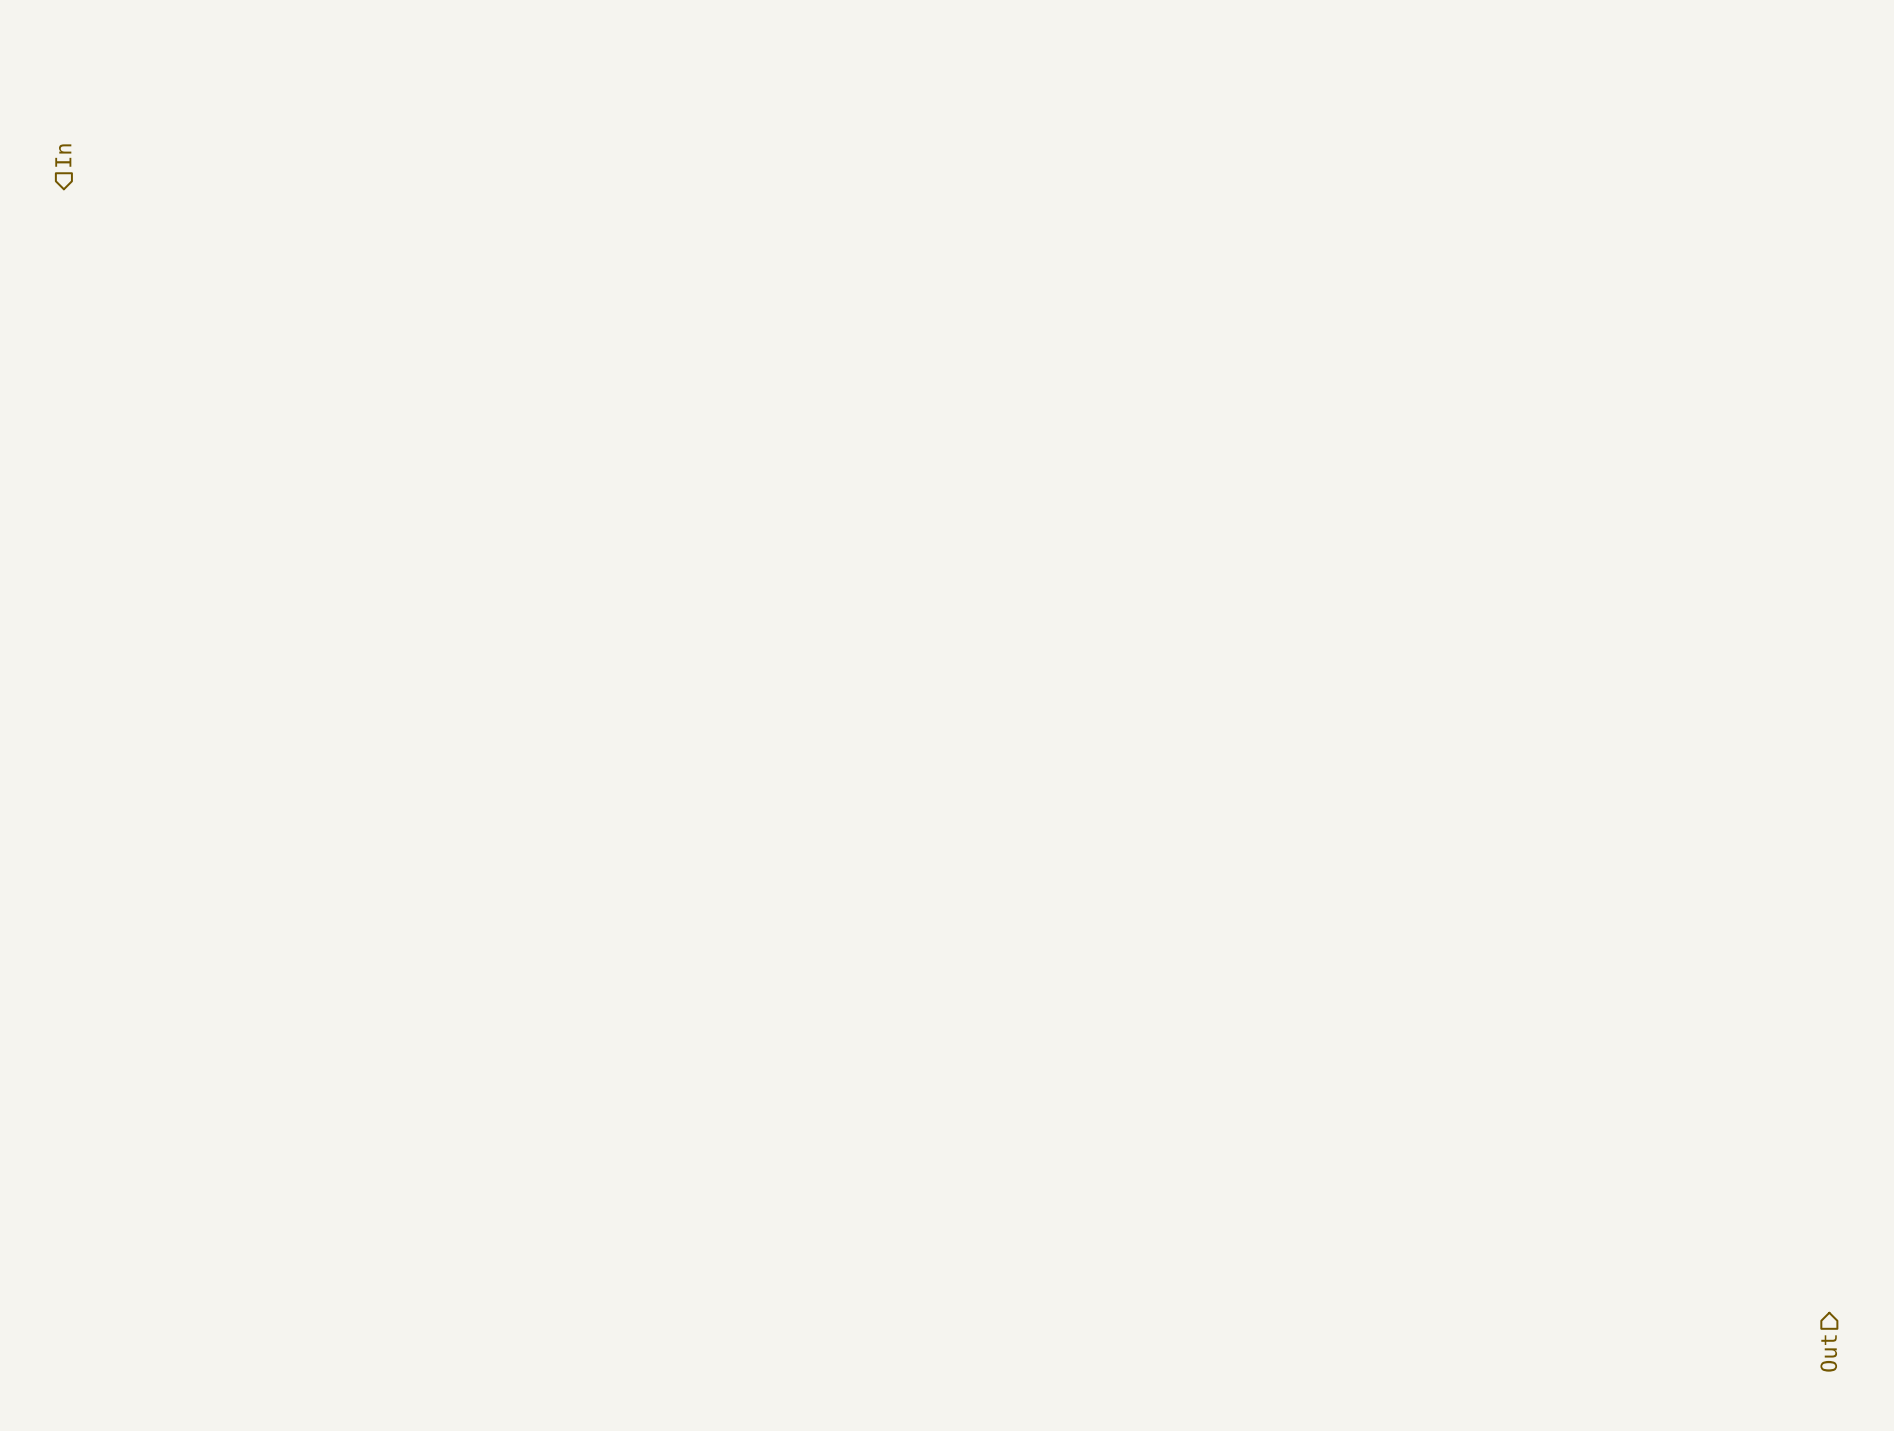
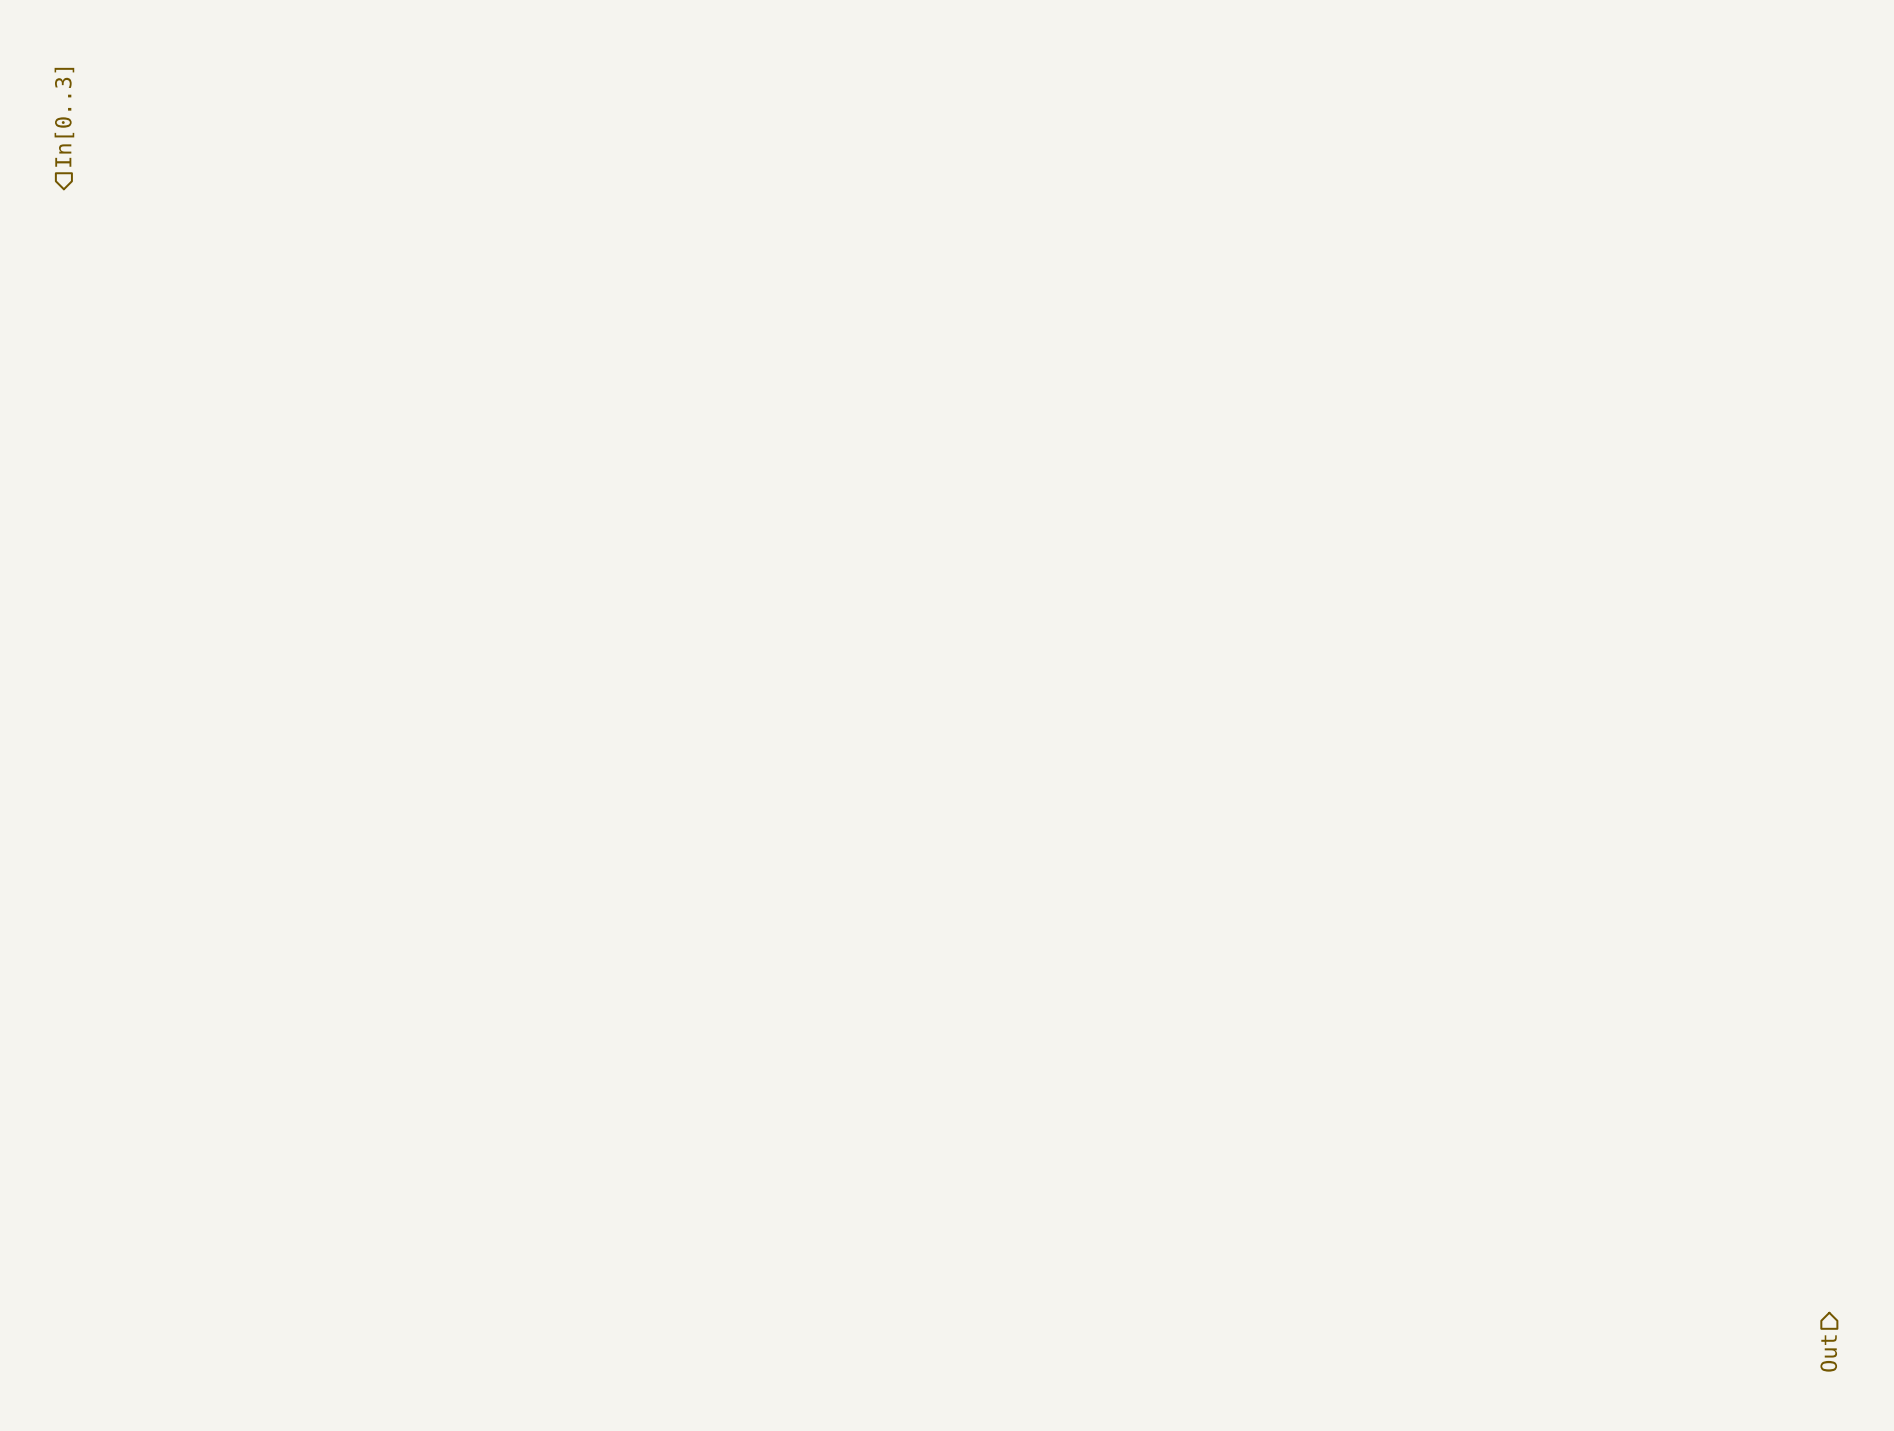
hierarchical label: In (63, 155) -> In[0..3] (64, 117)

